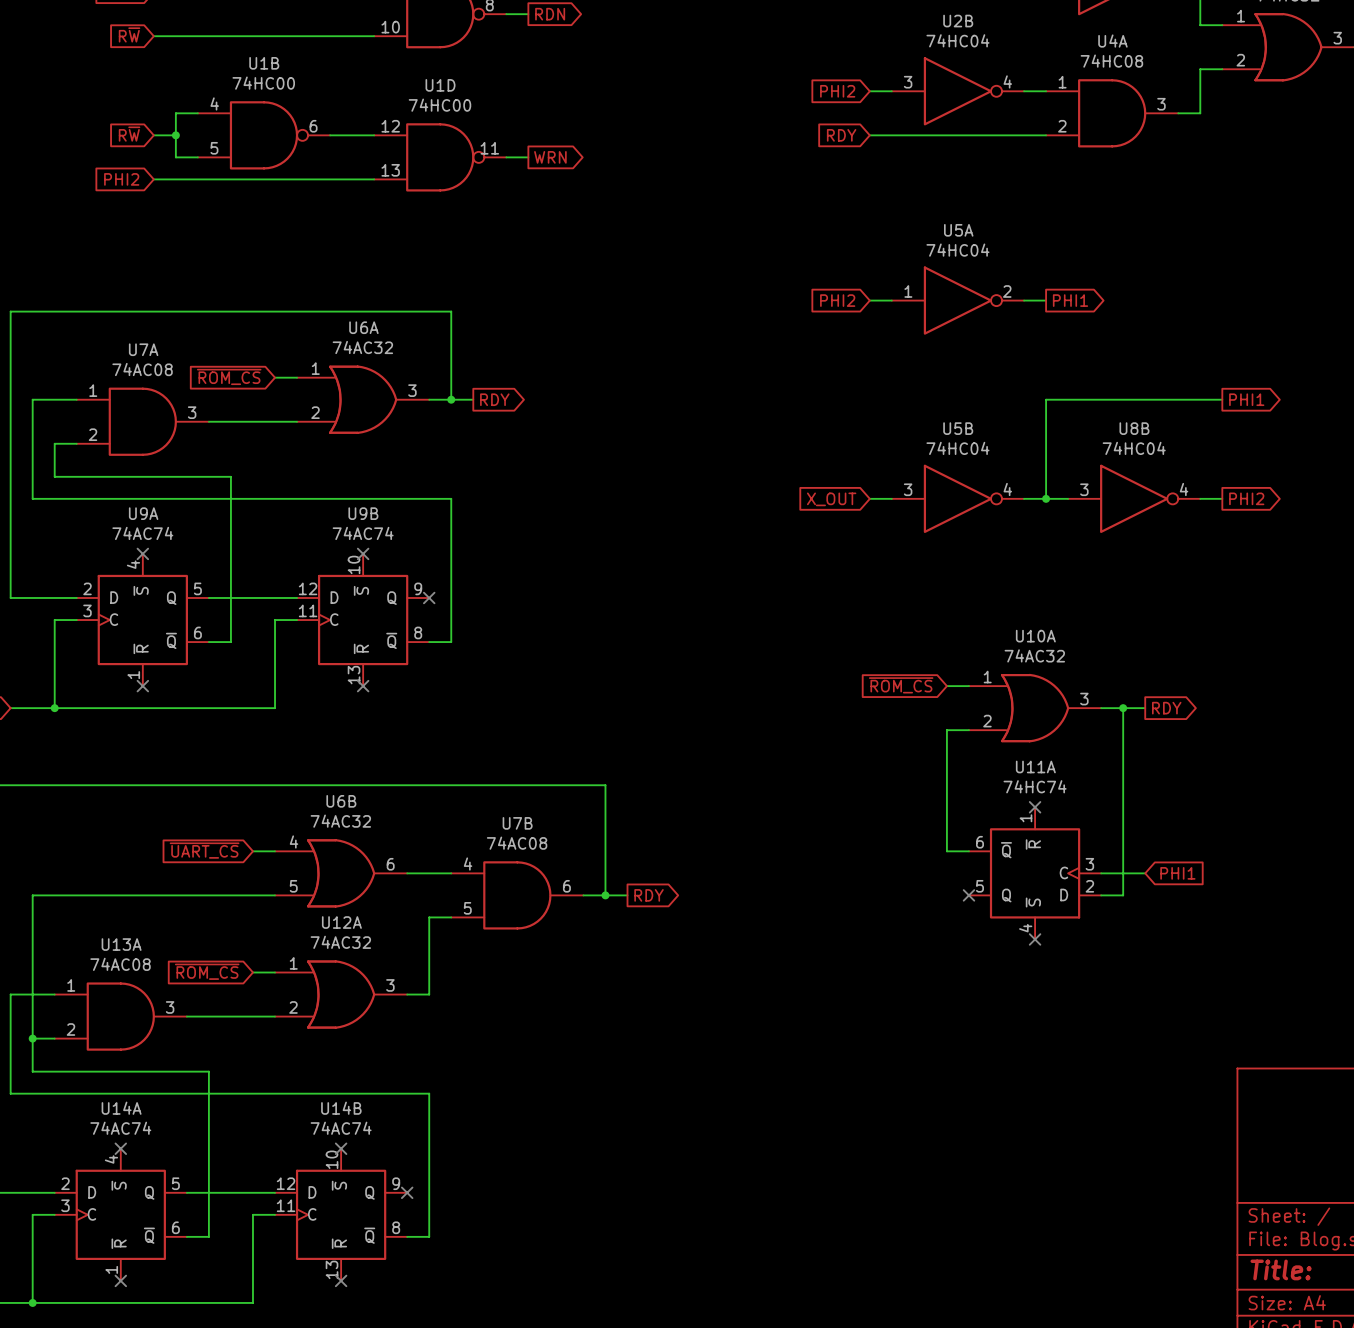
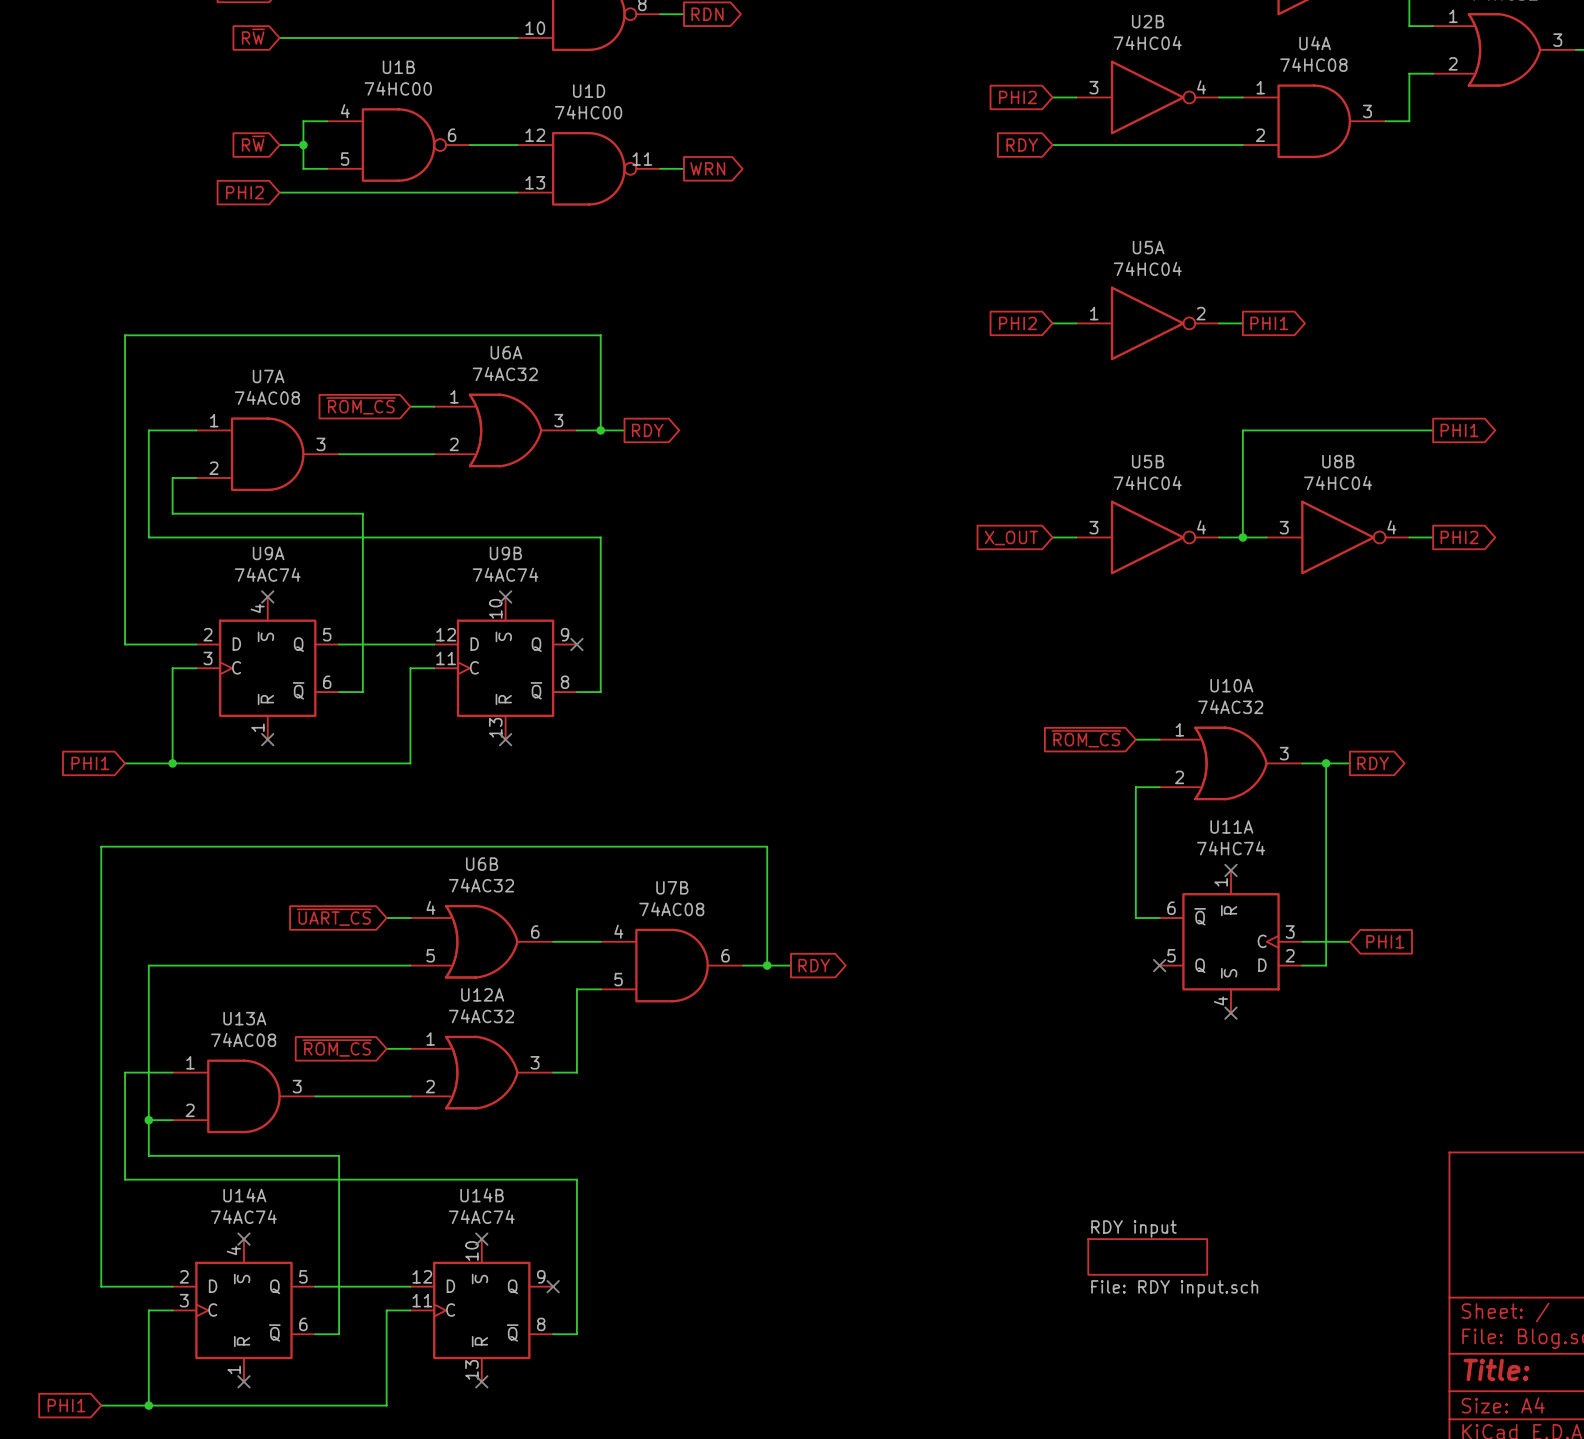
sheet RDY input: none -> File: RDY input.sch (1147, 1256)

